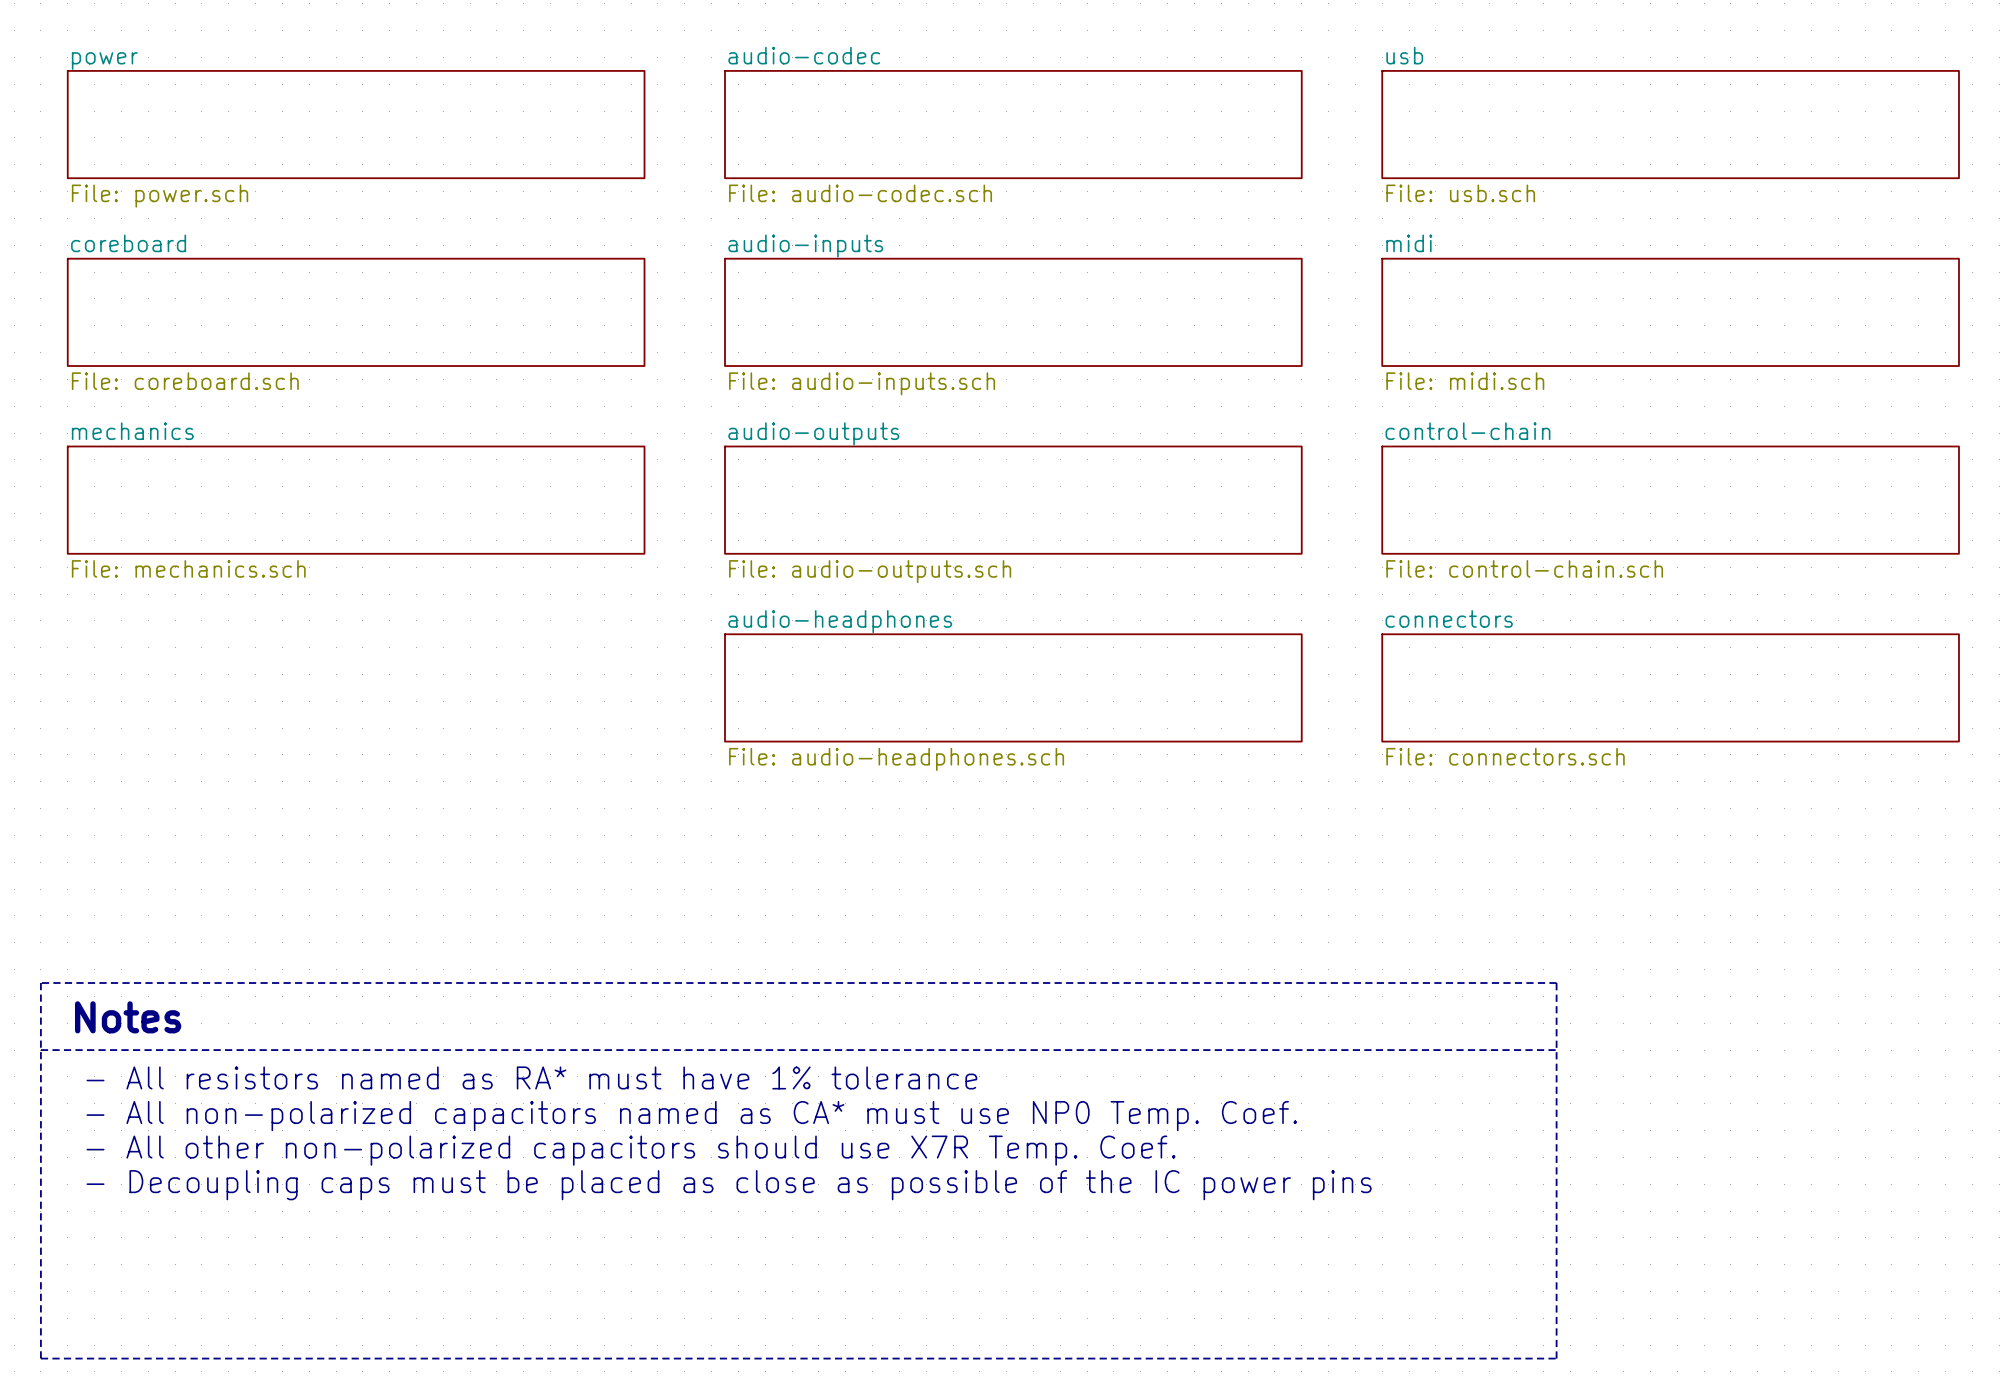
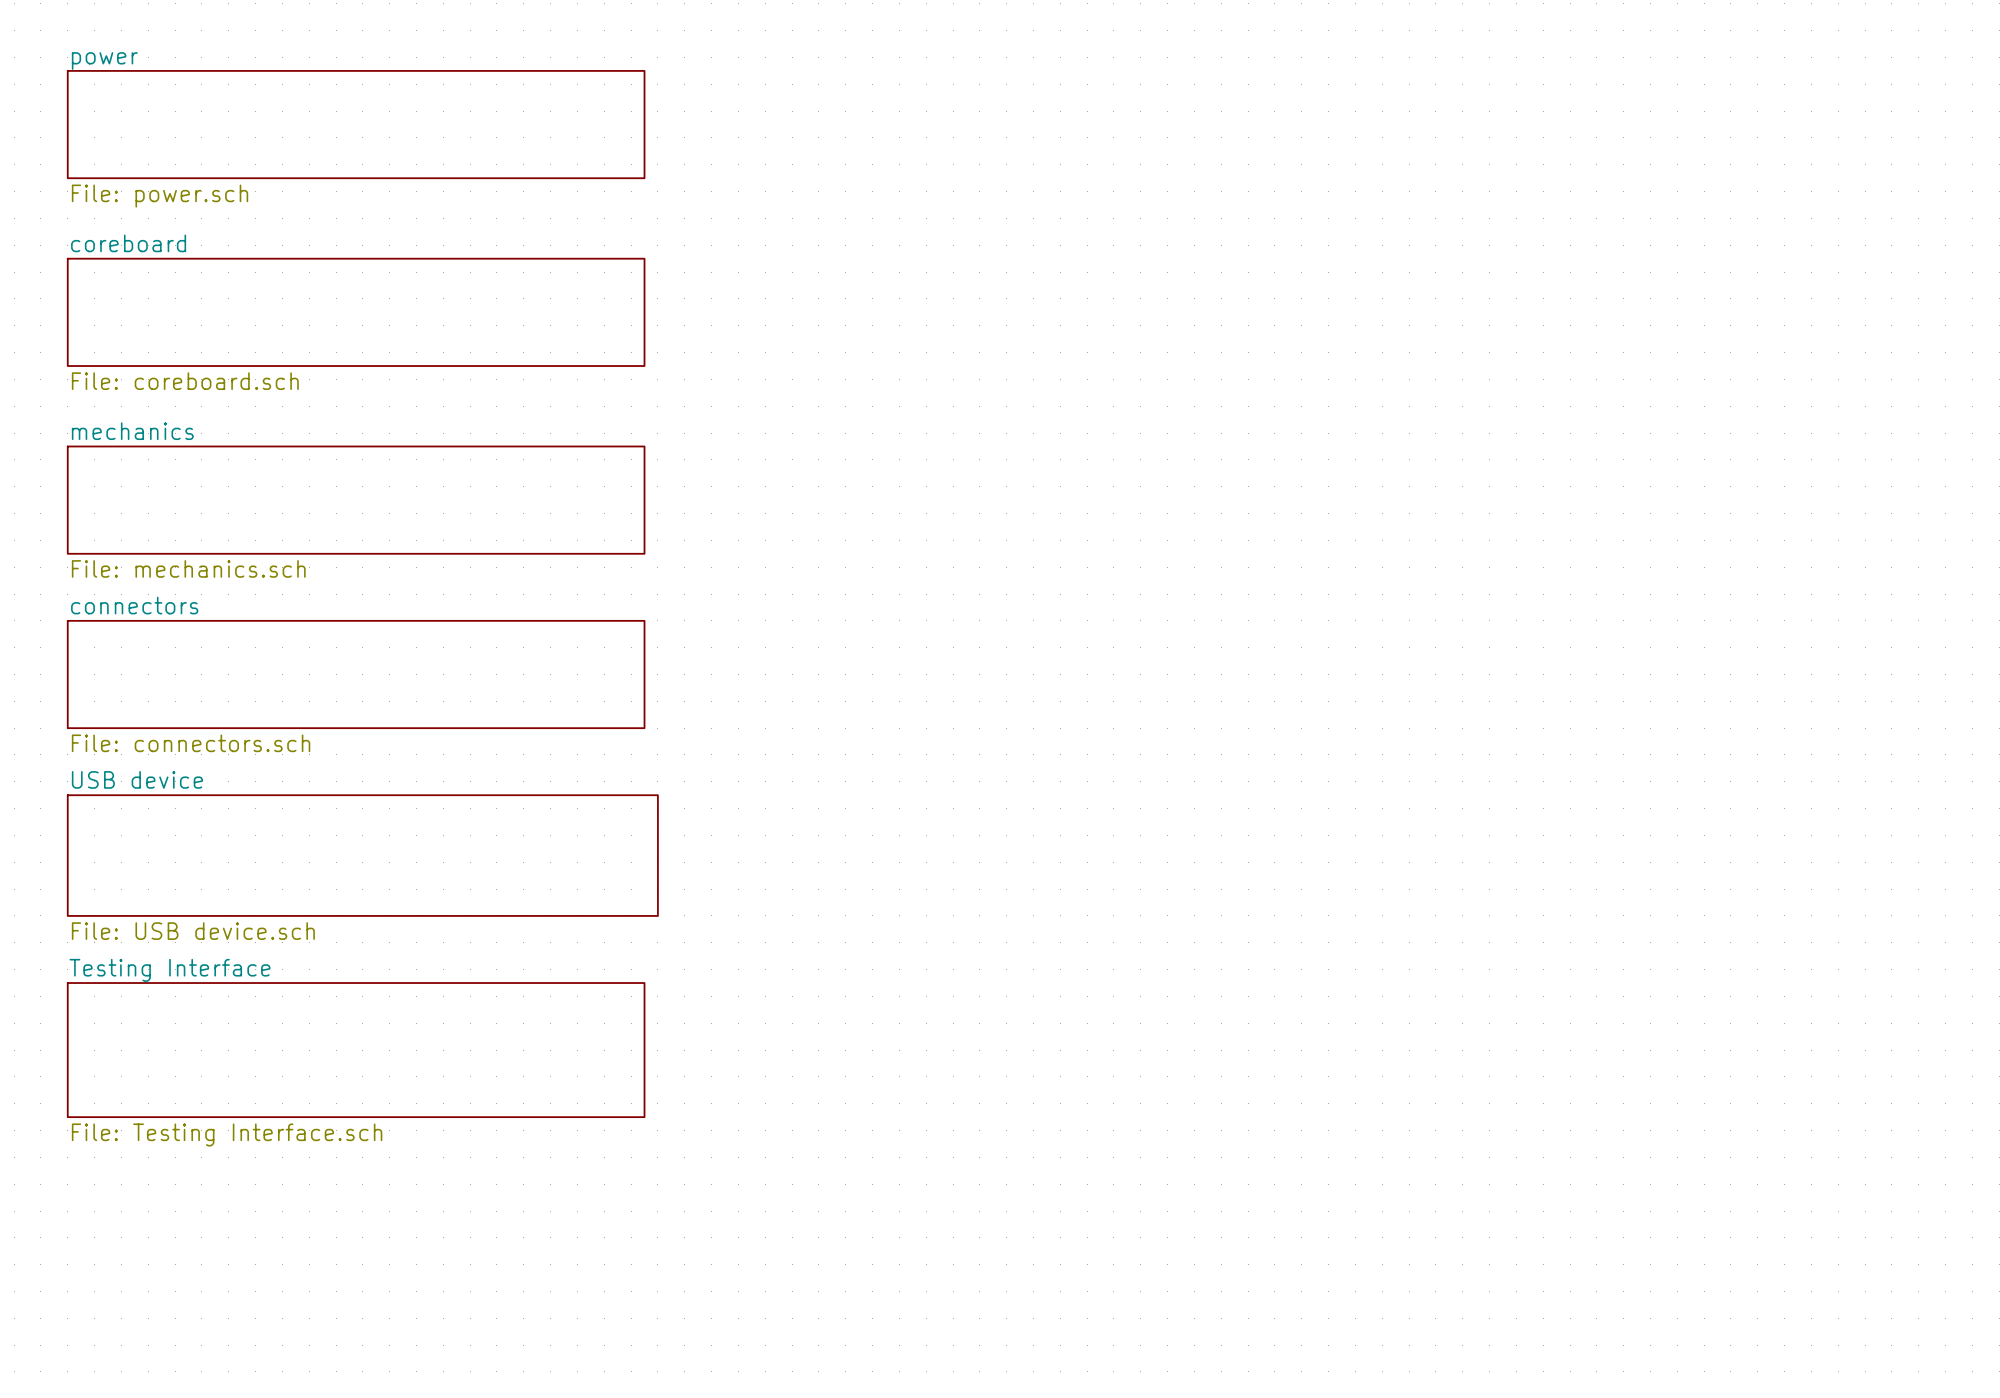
sheet audio-codec: File: audio-codec.sch (1013, 124) -> none
sheet usb: File: usb.sch (1670, 124) -> none
sheet audio-inputs: File: audio-inputs.sch (1013, 312) -> none
sheet midi: File: midi.sch (1670, 312) -> none
sheet audio-outputs: File: audio-outputs.sch (1013, 500) -> none
sheet control-chain: File: control-chain.sch (1670, 500) -> none
sheet connectors: none -> File: connectors.sch (356, 674)
sheet audio-headphones: File: audio-headphones.sch (1013, 687) -> none
sheet connectors: File: connectors.sch (1670, 687) -> none
sheet USB device: none -> File: USB device.sch (362, 855)
line: (40, 983) (1556, 983) (1556, 1358) (40, 1358) (40, 983) -> none
text: Notes (128, 1017) -> none
line: (40, 1050) (1556, 1050) -> none
sheet Testing Interface: none -> File: Testing Interface.sch (356, 1050)
text: - All resistors named as RA* must have 1% tolerance (531, 1077) -> none
text: - All non-polarized capacitors named as CA* must use NP0 Temp. Coef. (691, 1116) -> none
text: - All other non-polarized capacitors should use X7R Temp. Coef. (631, 1150) -> none
text: - Decoupling caps must be placed as close as possible of the IC power pins (729, 1185) -> none

